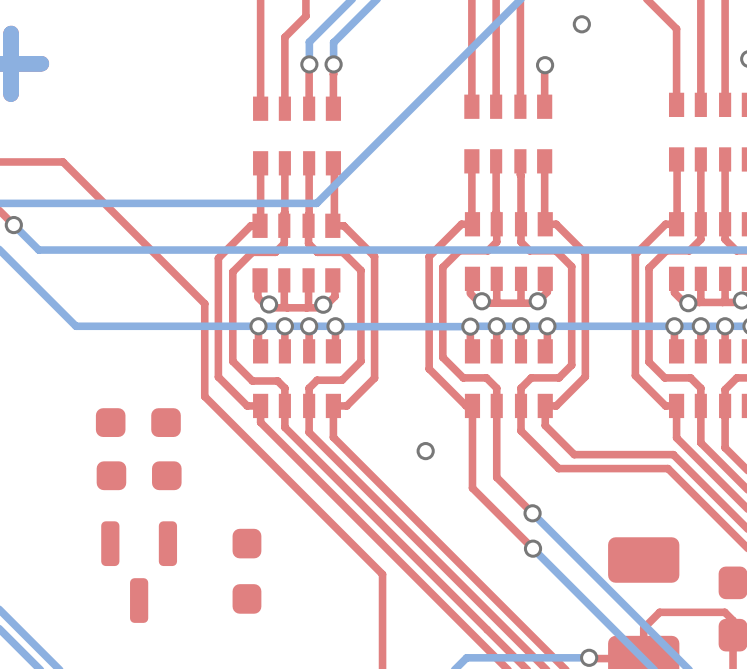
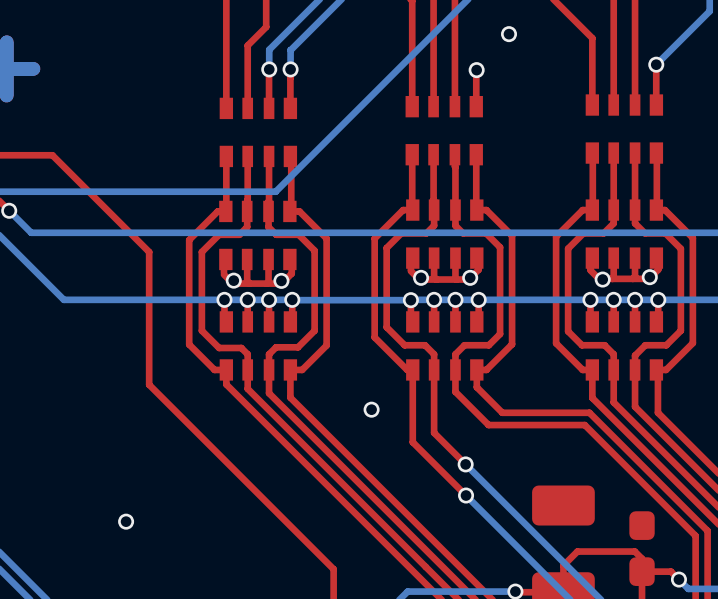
top track: (172, 271) (204, 303) (204, 396) (382, 574) (382, 632) -> (149, 252) (149, 384) (333, 569)
part: (138, 422) -> none
part: (139, 475) -> none
part: (246, 571) -> none
part: (139, 572) -> none
via: none -> (126, 521)

